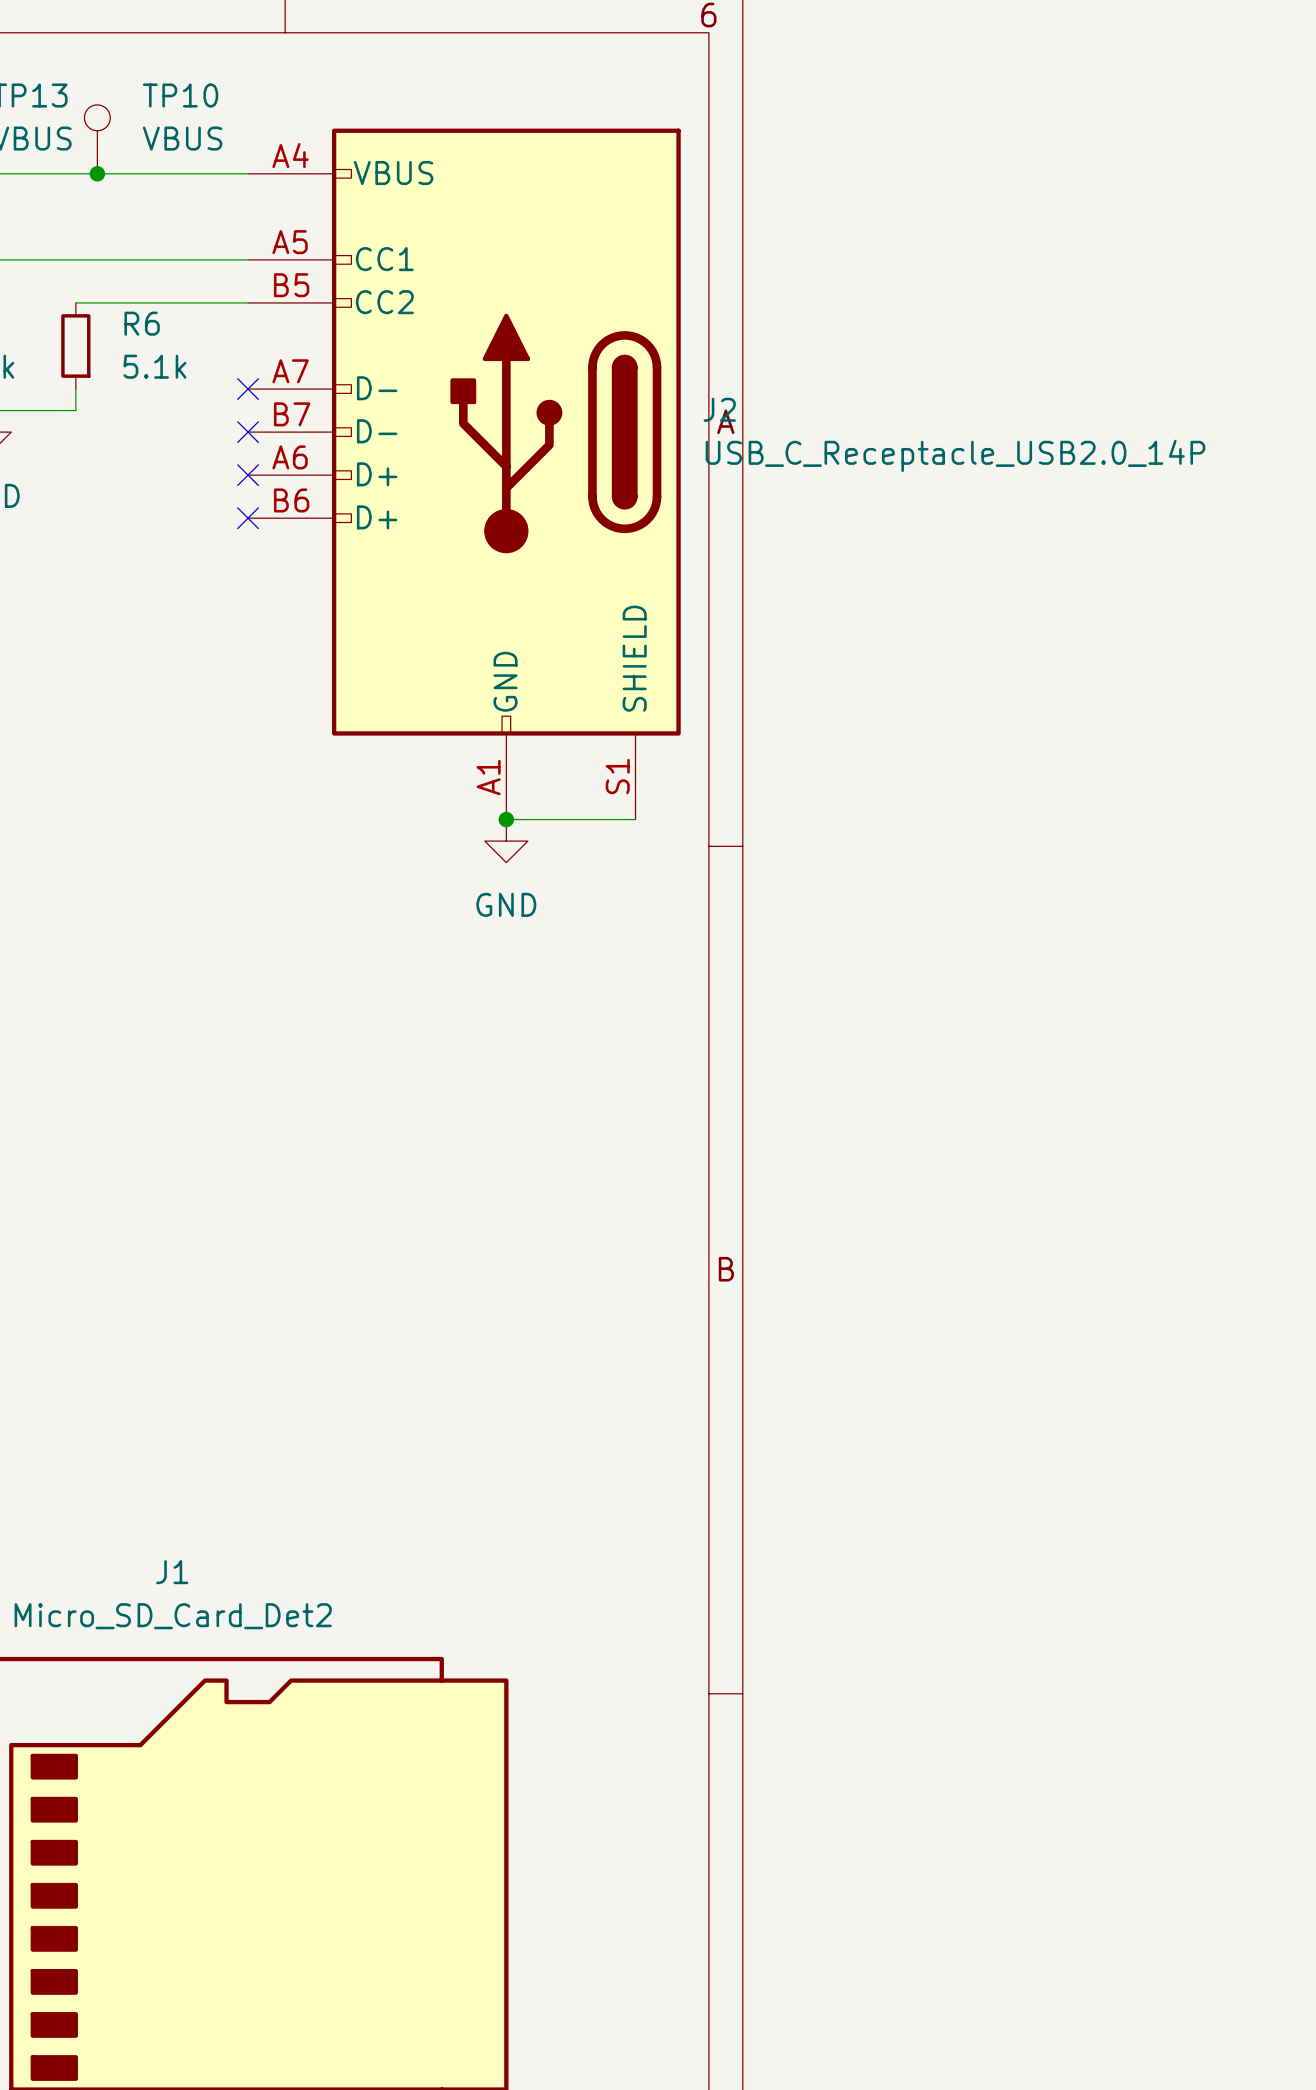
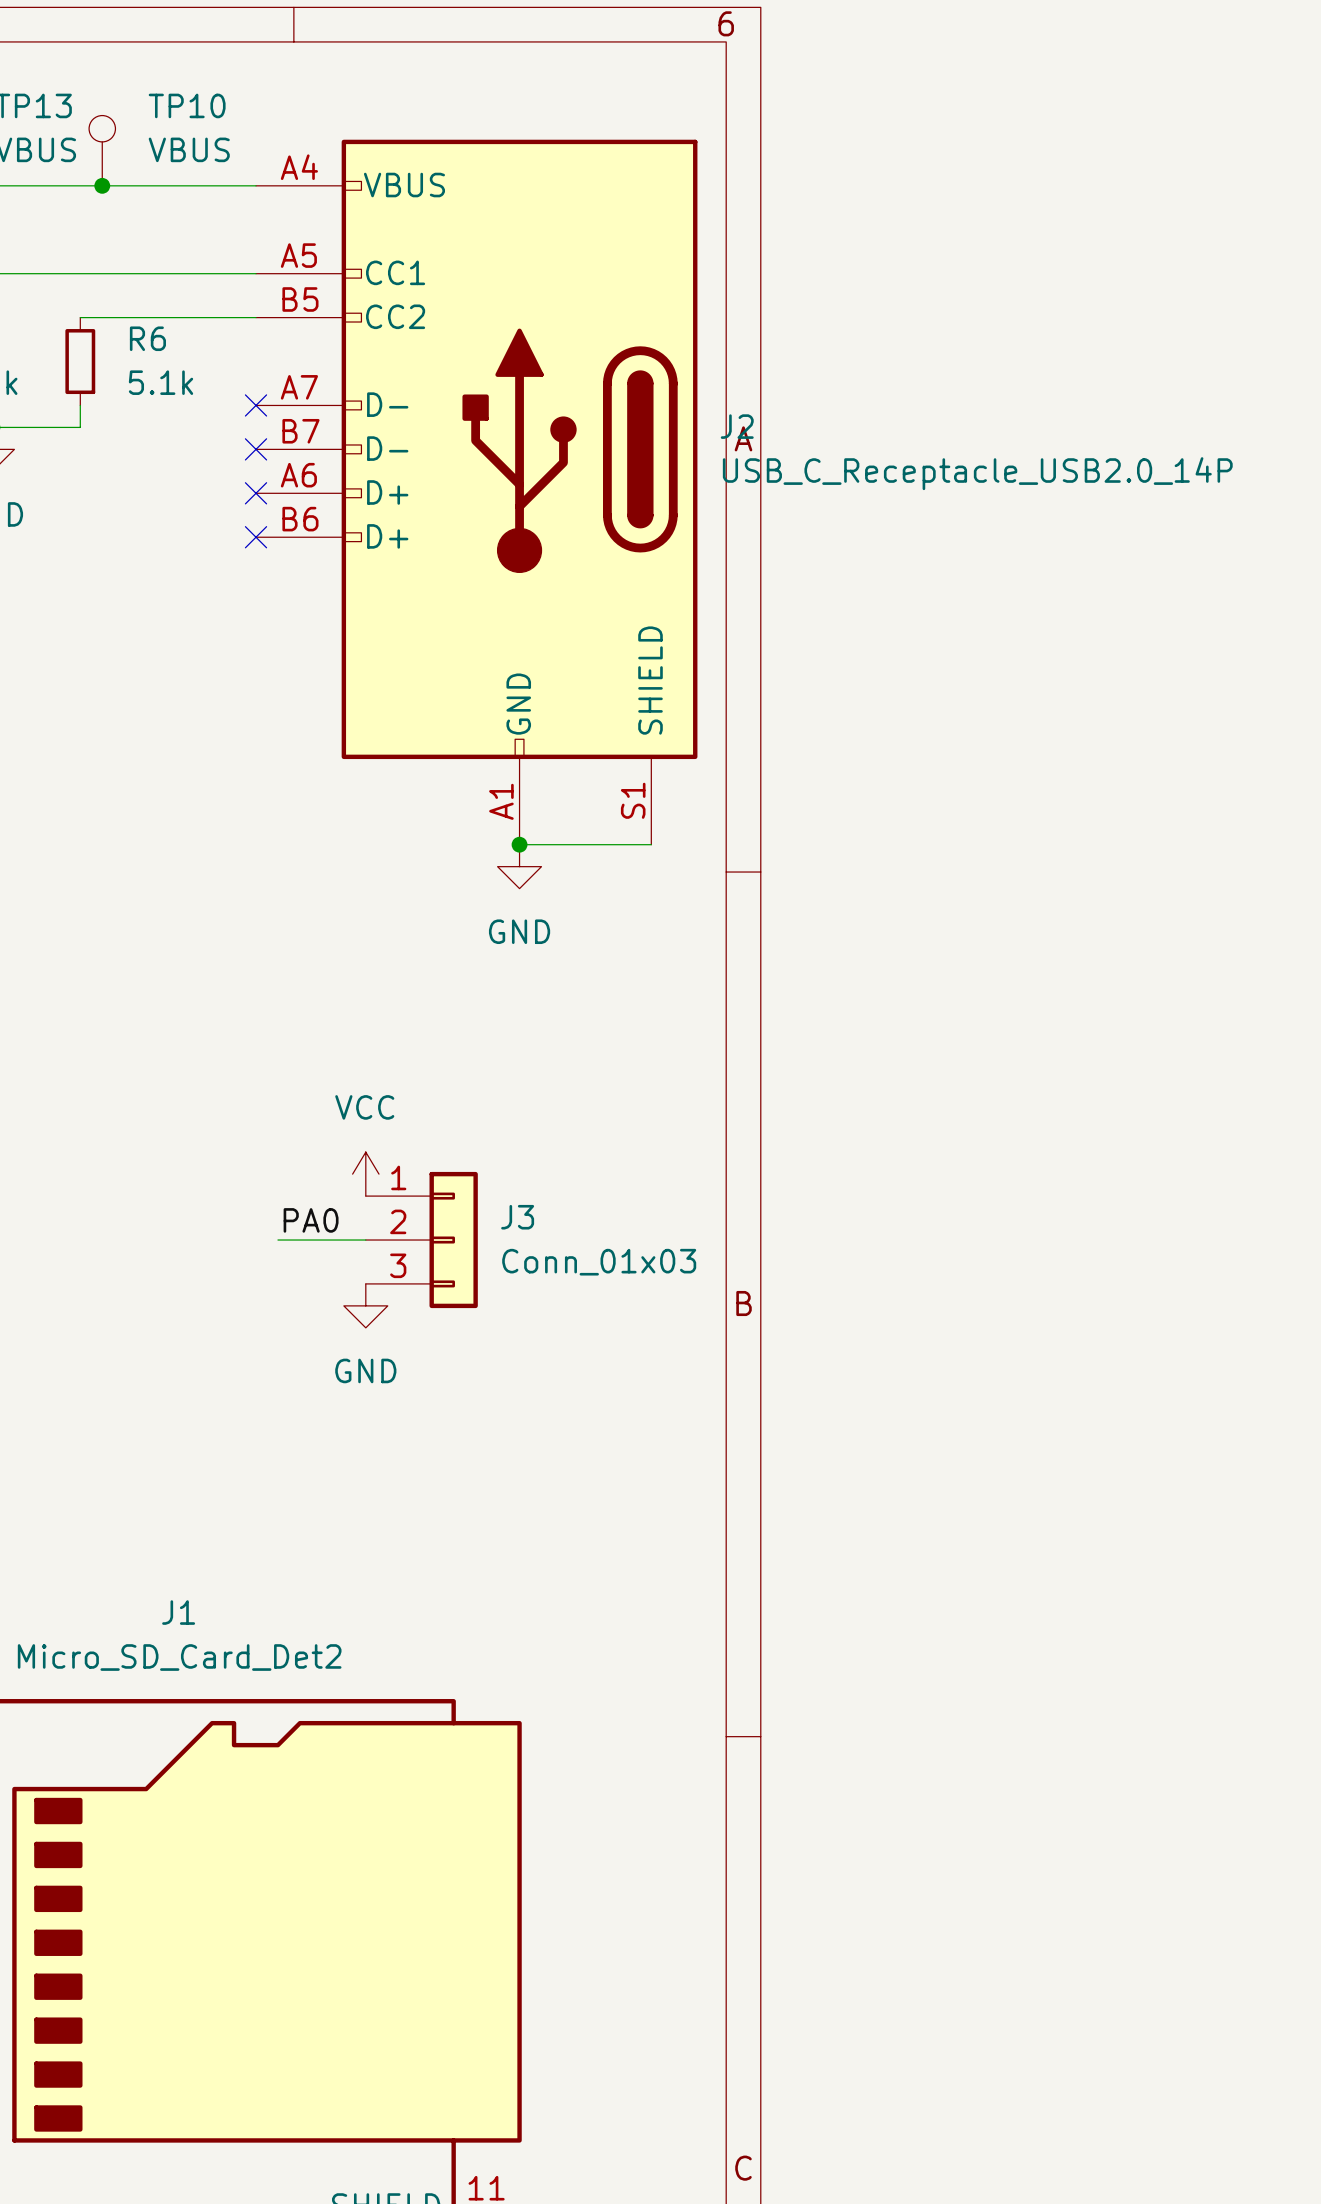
power symbol: none -> VCC (365, 1174)
label: none -> PA0 (311, 1220)
wire: none -> (277, 1240) (365, 1240)
J3: none -> Conn_01x03 (421, 1240)
power symbol: none -> GND (365, 1305)

